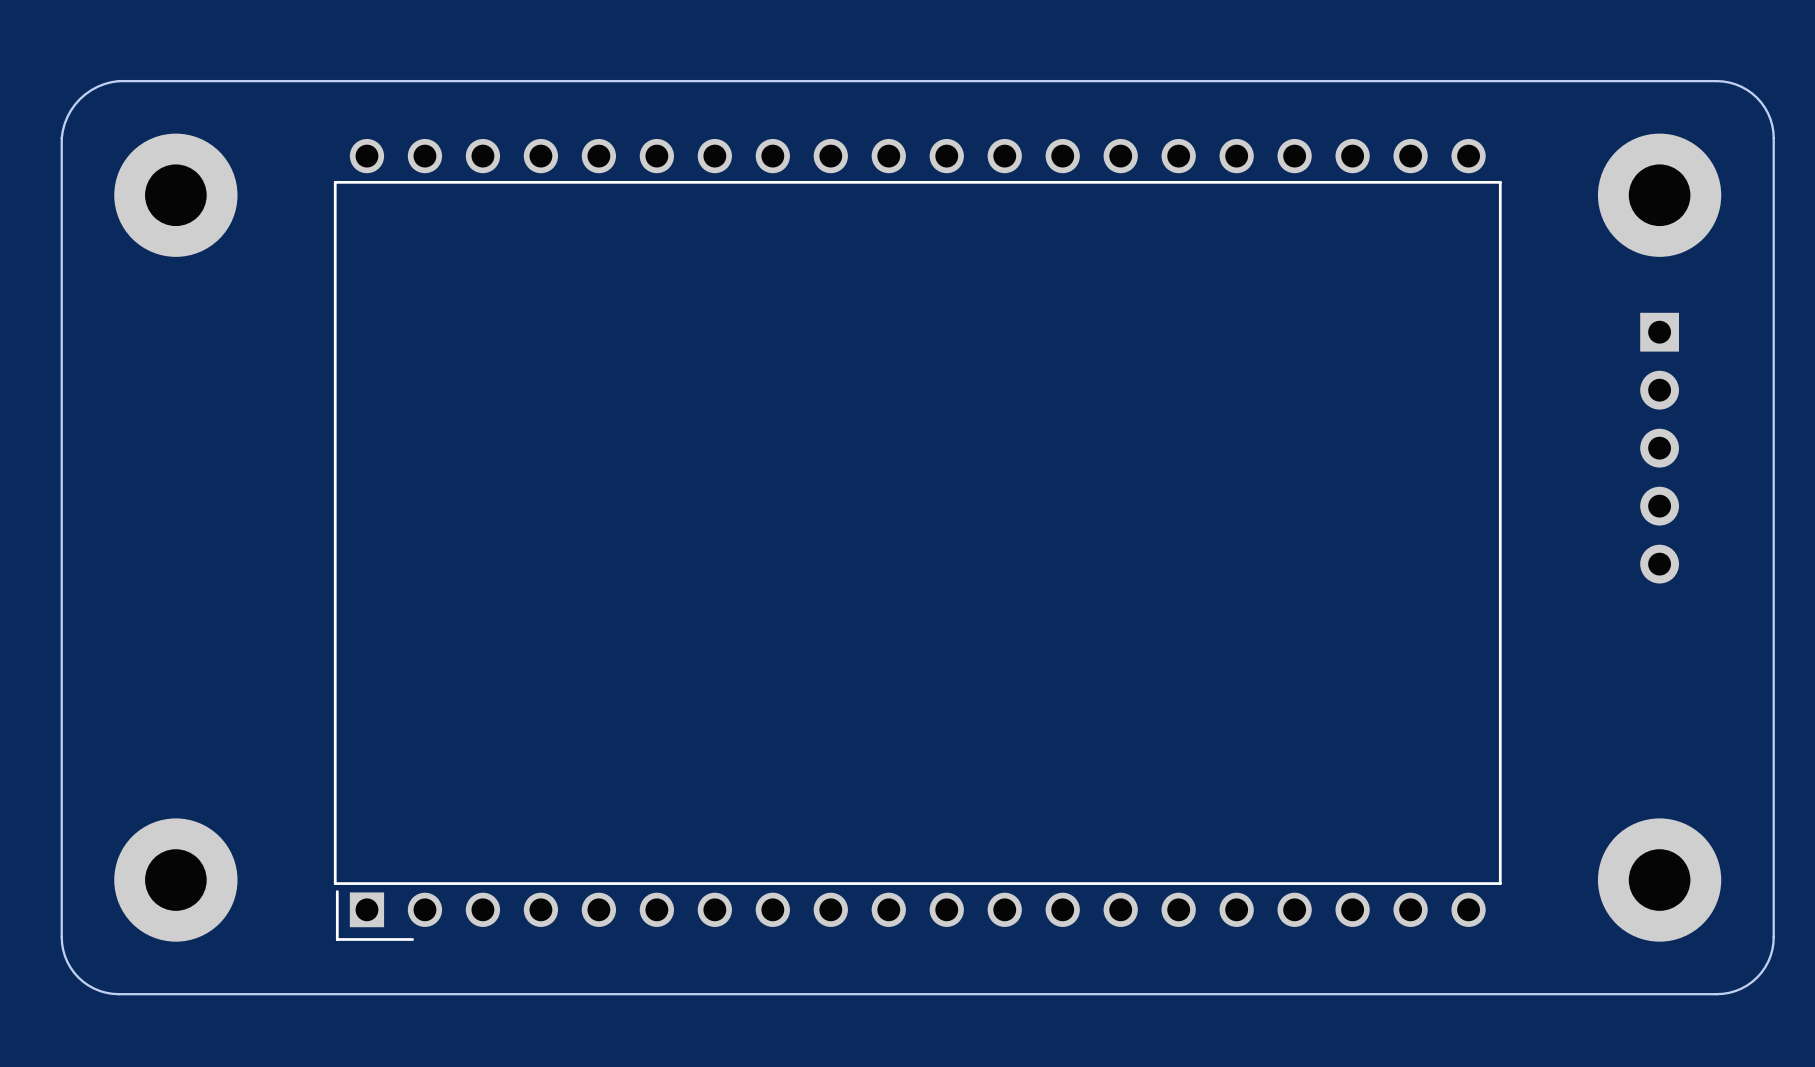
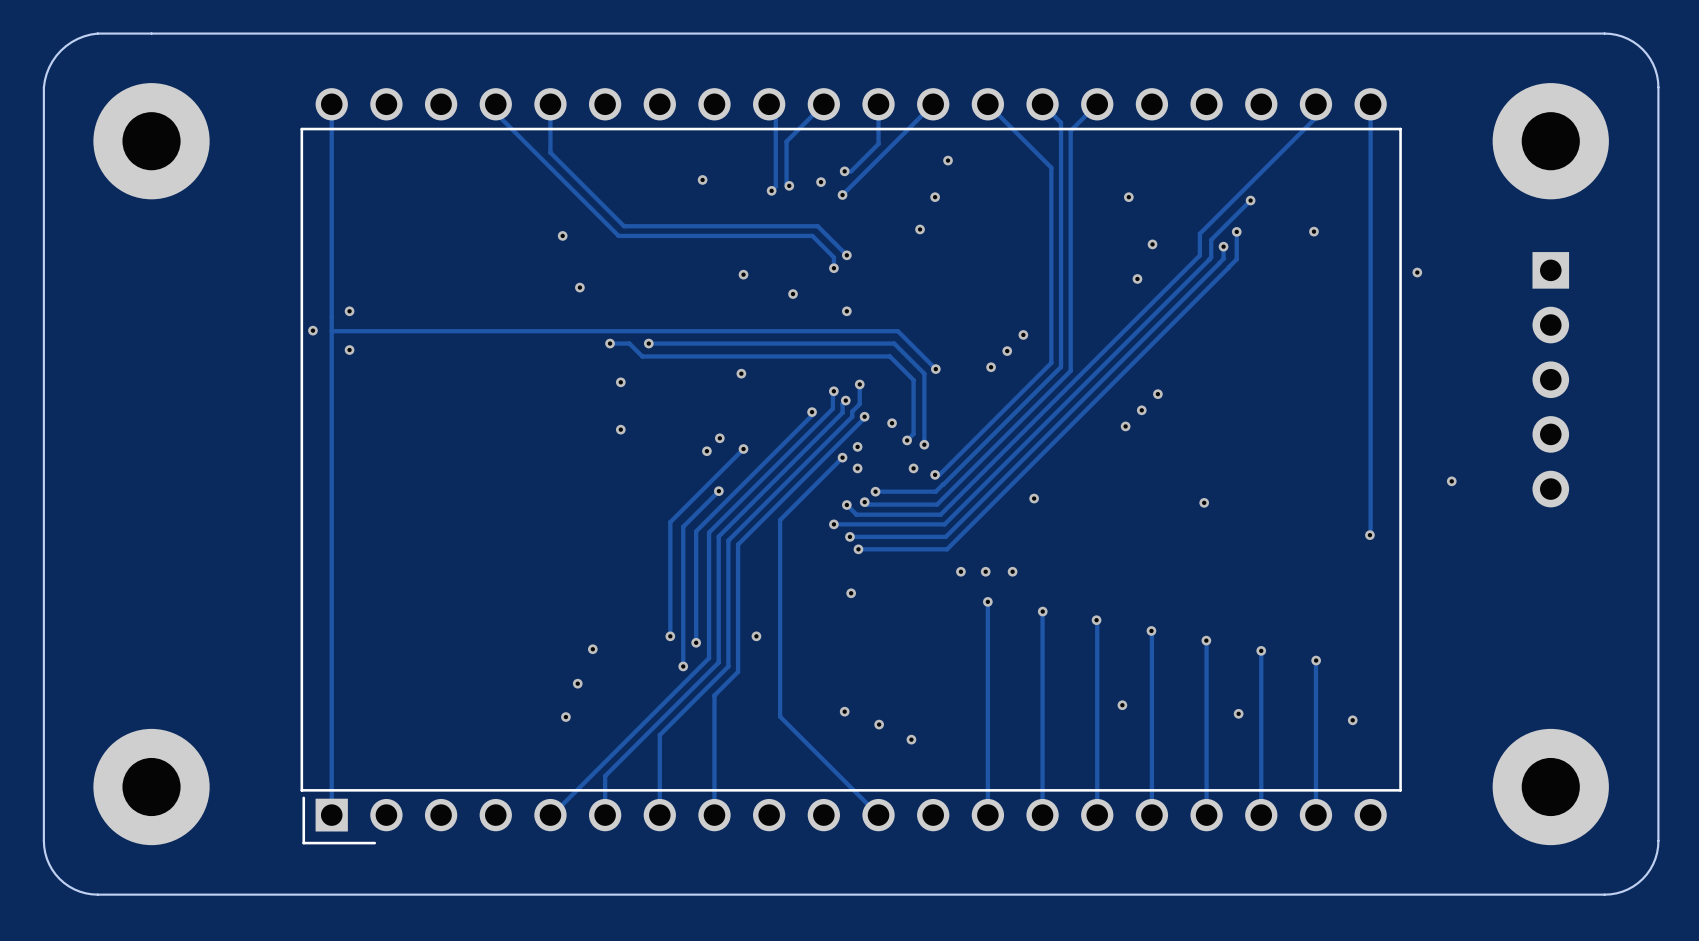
track: none -> (331, 104) (331, 815)
track: none -> (495, 104) (495, 113) (618, 235) (812, 235) (833, 257) (833, 268)
track: none -> (550, 104) (550, 152) (624, 226) (817, 226) (846, 255)
track: none -> (769, 104) (775, 110) (775, 186) (771, 190)
track: none -> (823, 104) (786, 141) (786, 183) (789, 185)
track: none -> (878, 104) (878, 143) (851, 171) (844, 171)
track: none -> (933, 104) (842, 194)
track: none -> (987, 104) (1051, 167) (1051, 362) (939, 474) (935, 474)
track: none -> (1042, 104) (1061, 122) (1061, 366) (935, 491) (875, 491)
track: none -> (1097, 104) (1070, 130) (1070, 370) (937, 504) (867, 504) (864, 502)
track: none -> (1315, 104) (1315, 117) (1199, 233) (1199, 255) (940, 514) (856, 514) (846, 505)
track: none -> (1370, 104) (1369, 535)
via: none -> (948, 160)
via: none -> (844, 171)
via: none -> (702, 179)
via: none -> (821, 182)
via: none -> (789, 185)
via: none -> (771, 190)
via: none -> (842, 195)
via: none -> (935, 197)
via: none -> (1128, 197)
track: none -> (1250, 200) (1211, 239) (1209, 259)
via: none -> (1250, 200)
via: none -> (920, 229)
track: none -> (1236, 231) (1236, 259) (1228, 267)
via: none -> (1236, 231)
via: none -> (1313, 231)
via: none -> (562, 235)
via: none -> (1152, 244)
track: none -> (1223, 246) (1223, 258) (1219, 263)
via: none -> (1223, 246)
via: none -> (846, 255)
track: none -> (1209, 259) (944, 524) (833, 524)
track: none -> (1219, 263) (945, 536) (849, 536)
via: none -> (833, 268)
track: none -> (1228, 267) (947, 549) (858, 549)
via: none -> (1417, 272)
via: none -> (743, 274)
via: none -> (1137, 278)
via: none -> (579, 287)
via: none -> (793, 294)
via: none -> (349, 311)
via: none -> (846, 311)
via: none -> (312, 330)
track: none -> (331, 331) (897, 331) (935, 369)
via: none -> (1023, 334)
track: none -> (610, 343) (629, 343) (642, 356) (889, 356) (913, 380) (913, 433) (907, 440)
via: none -> (610, 343)
track: none -> (648, 343) (894, 343) (924, 373) (924, 444)
via: none -> (648, 343)
via: none -> (349, 350)
via: none -> (1007, 351)
via: none -> (991, 367)
via: none -> (935, 369)
via: none -> (741, 373)
via: none -> (620, 382)
track: none -> (859, 384) (859, 404) (852, 411) (852, 416) (728, 540) (728, 666) (659, 735) (659, 815)
via: none -> (859, 384)
track: none -> (833, 391) (832, 408) (709, 532) (709, 658) (550, 815)
via: none -> (833, 391)
via: none -> (1157, 394)
track: none -> (845, 400) (842, 403) (842, 412) (718, 536) (718, 662) (605, 776) (605, 815)
via: none -> (845, 400)
via: none -> (1141, 410)
track: none -> (812, 412) (812, 415) (696, 531) (696, 642)
via: none -> (812, 412)
track: none -> (864, 416) (738, 544) (738, 671) (714, 695) (714, 815)
via: none -> (864, 416)
via: none -> (892, 423)
via: none -> (1125, 426)
via: none -> (620, 429)
via: none -> (719, 438)
via: none -> (907, 440)
via: none -> (924, 444)
via: none -> (857, 446)
track: none -> (743, 449) (670, 522) (670, 636)
via: none -> (743, 449)
via: none -> (706, 451)
track: none -> (842, 457) (780, 520) (780, 716) (878, 815)
via: none -> (842, 457)
via: none -> (857, 468)
via: none -> (913, 468)
via: none -> (935, 474)
via: none -> (1451, 481)
track: none -> (718, 491) (683, 526) (683, 666)
via: none -> (718, 491)
via: none -> (875, 491)
via: none -> (1034, 498)
via: none -> (864, 502)
via: none -> (1204, 502)
via: none -> (846, 505)
via: none -> (833, 524)
via: none -> (1369, 535)
via: none -> (849, 536)
via: none -> (858, 549)
via: none -> (960, 571)
via: none -> (985, 571)
via: none -> (1012, 571)
via: none -> (851, 593)
track: none -> (987, 601) (987, 815)
via: none -> (987, 601)
track: none -> (1042, 611) (1042, 815)
via: none -> (1042, 611)
track: none -> (1096, 620) (1097, 815)
via: none -> (1096, 620)
track: none -> (1151, 630) (1151, 815)
via: none -> (1151, 630)
via: none -> (670, 636)
via: none -> (756, 636)
via: none -> (1206, 640)
track: none -> (1206, 640) (1206, 815)
via: none -> (696, 642)
via: none -> (592, 649)
track: none -> (1261, 650) (1261, 815)
via: none -> (1261, 650)
via: none -> (1316, 660)
track: none -> (1315, 660) (1315, 815)
via: none -> (683, 666)
via: none -> (577, 683)
via: none -> (1122, 705)
via: none -> (844, 711)
via: none -> (1238, 713)
via: none -> (565, 717)
via: none -> (1352, 720)
via: none -> (879, 724)
via: none -> (911, 739)

